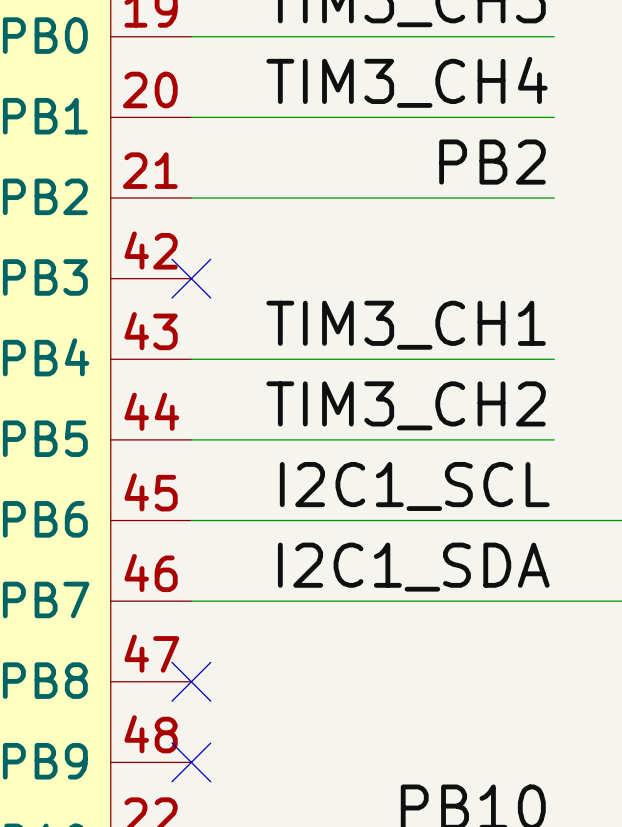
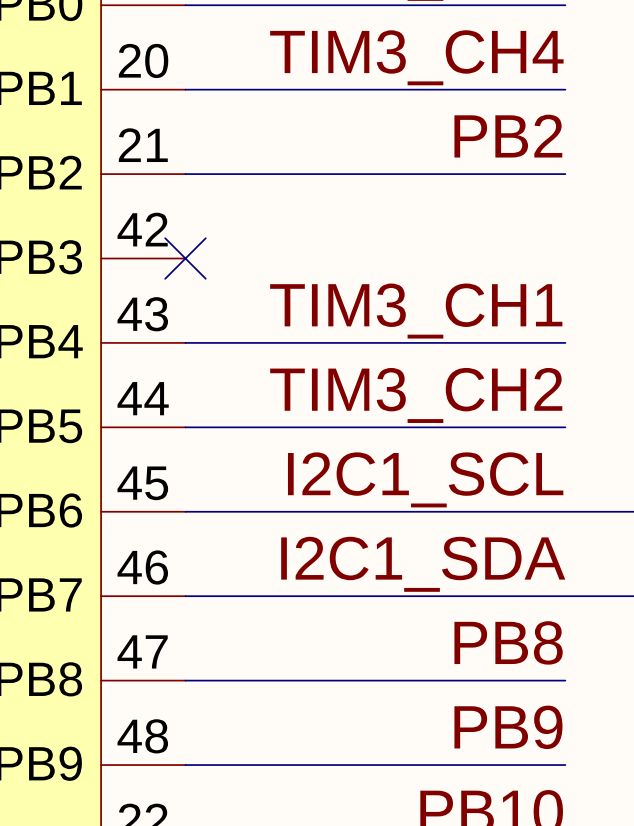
label: none -> PB8 (508, 642)
wire: none -> (185, 680) (565, 680)
no-connect mark: (191, 681) -> none
label: none -> PB9 (508, 727)
wire: none -> (185, 765) (565, 765)
no-connect mark: (191, 762) -> none

